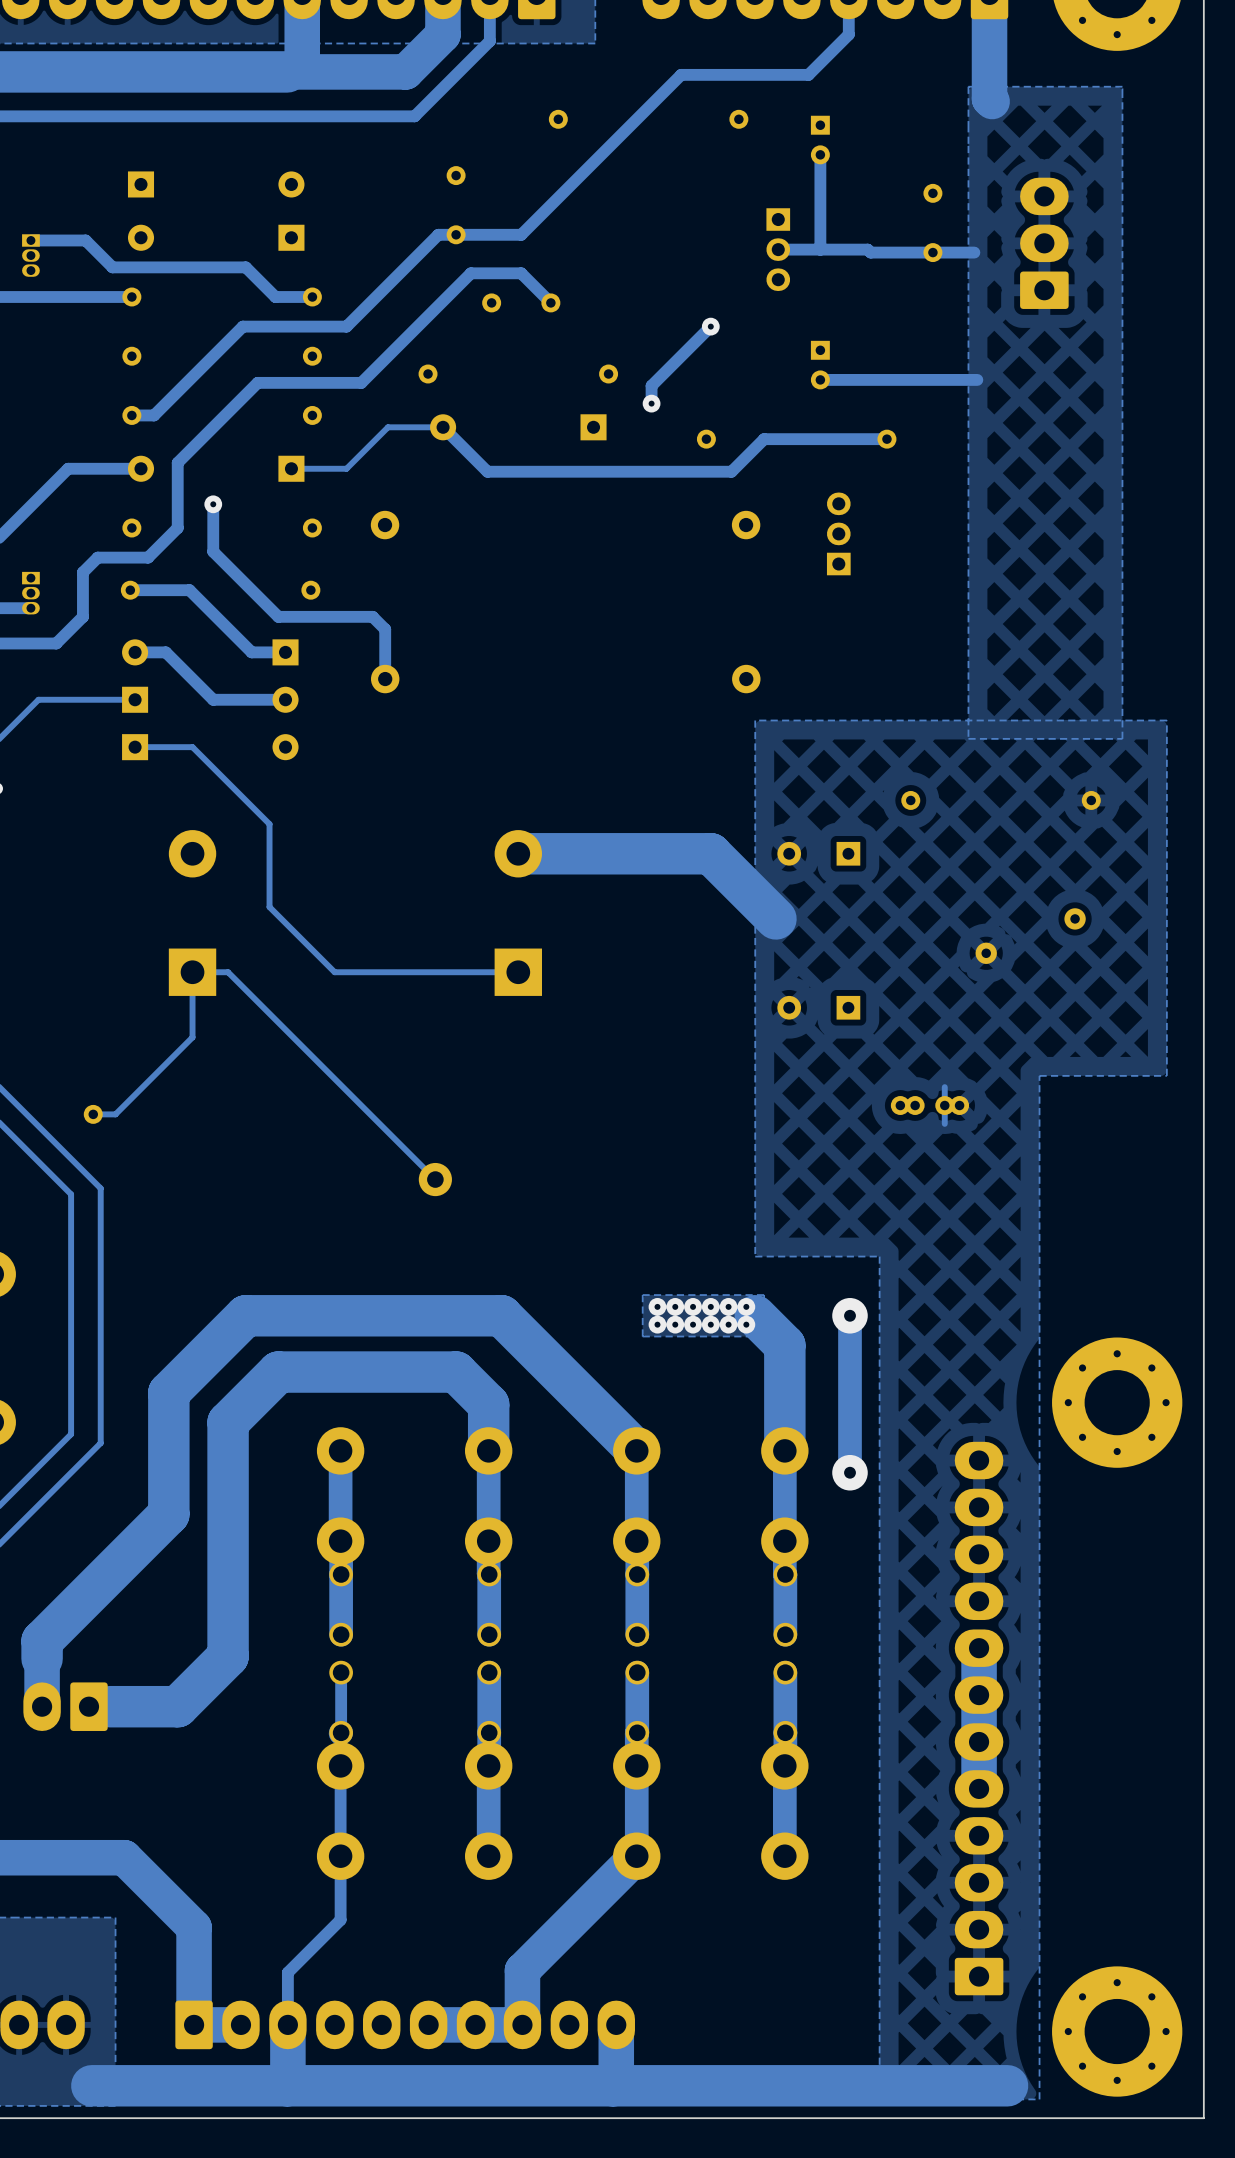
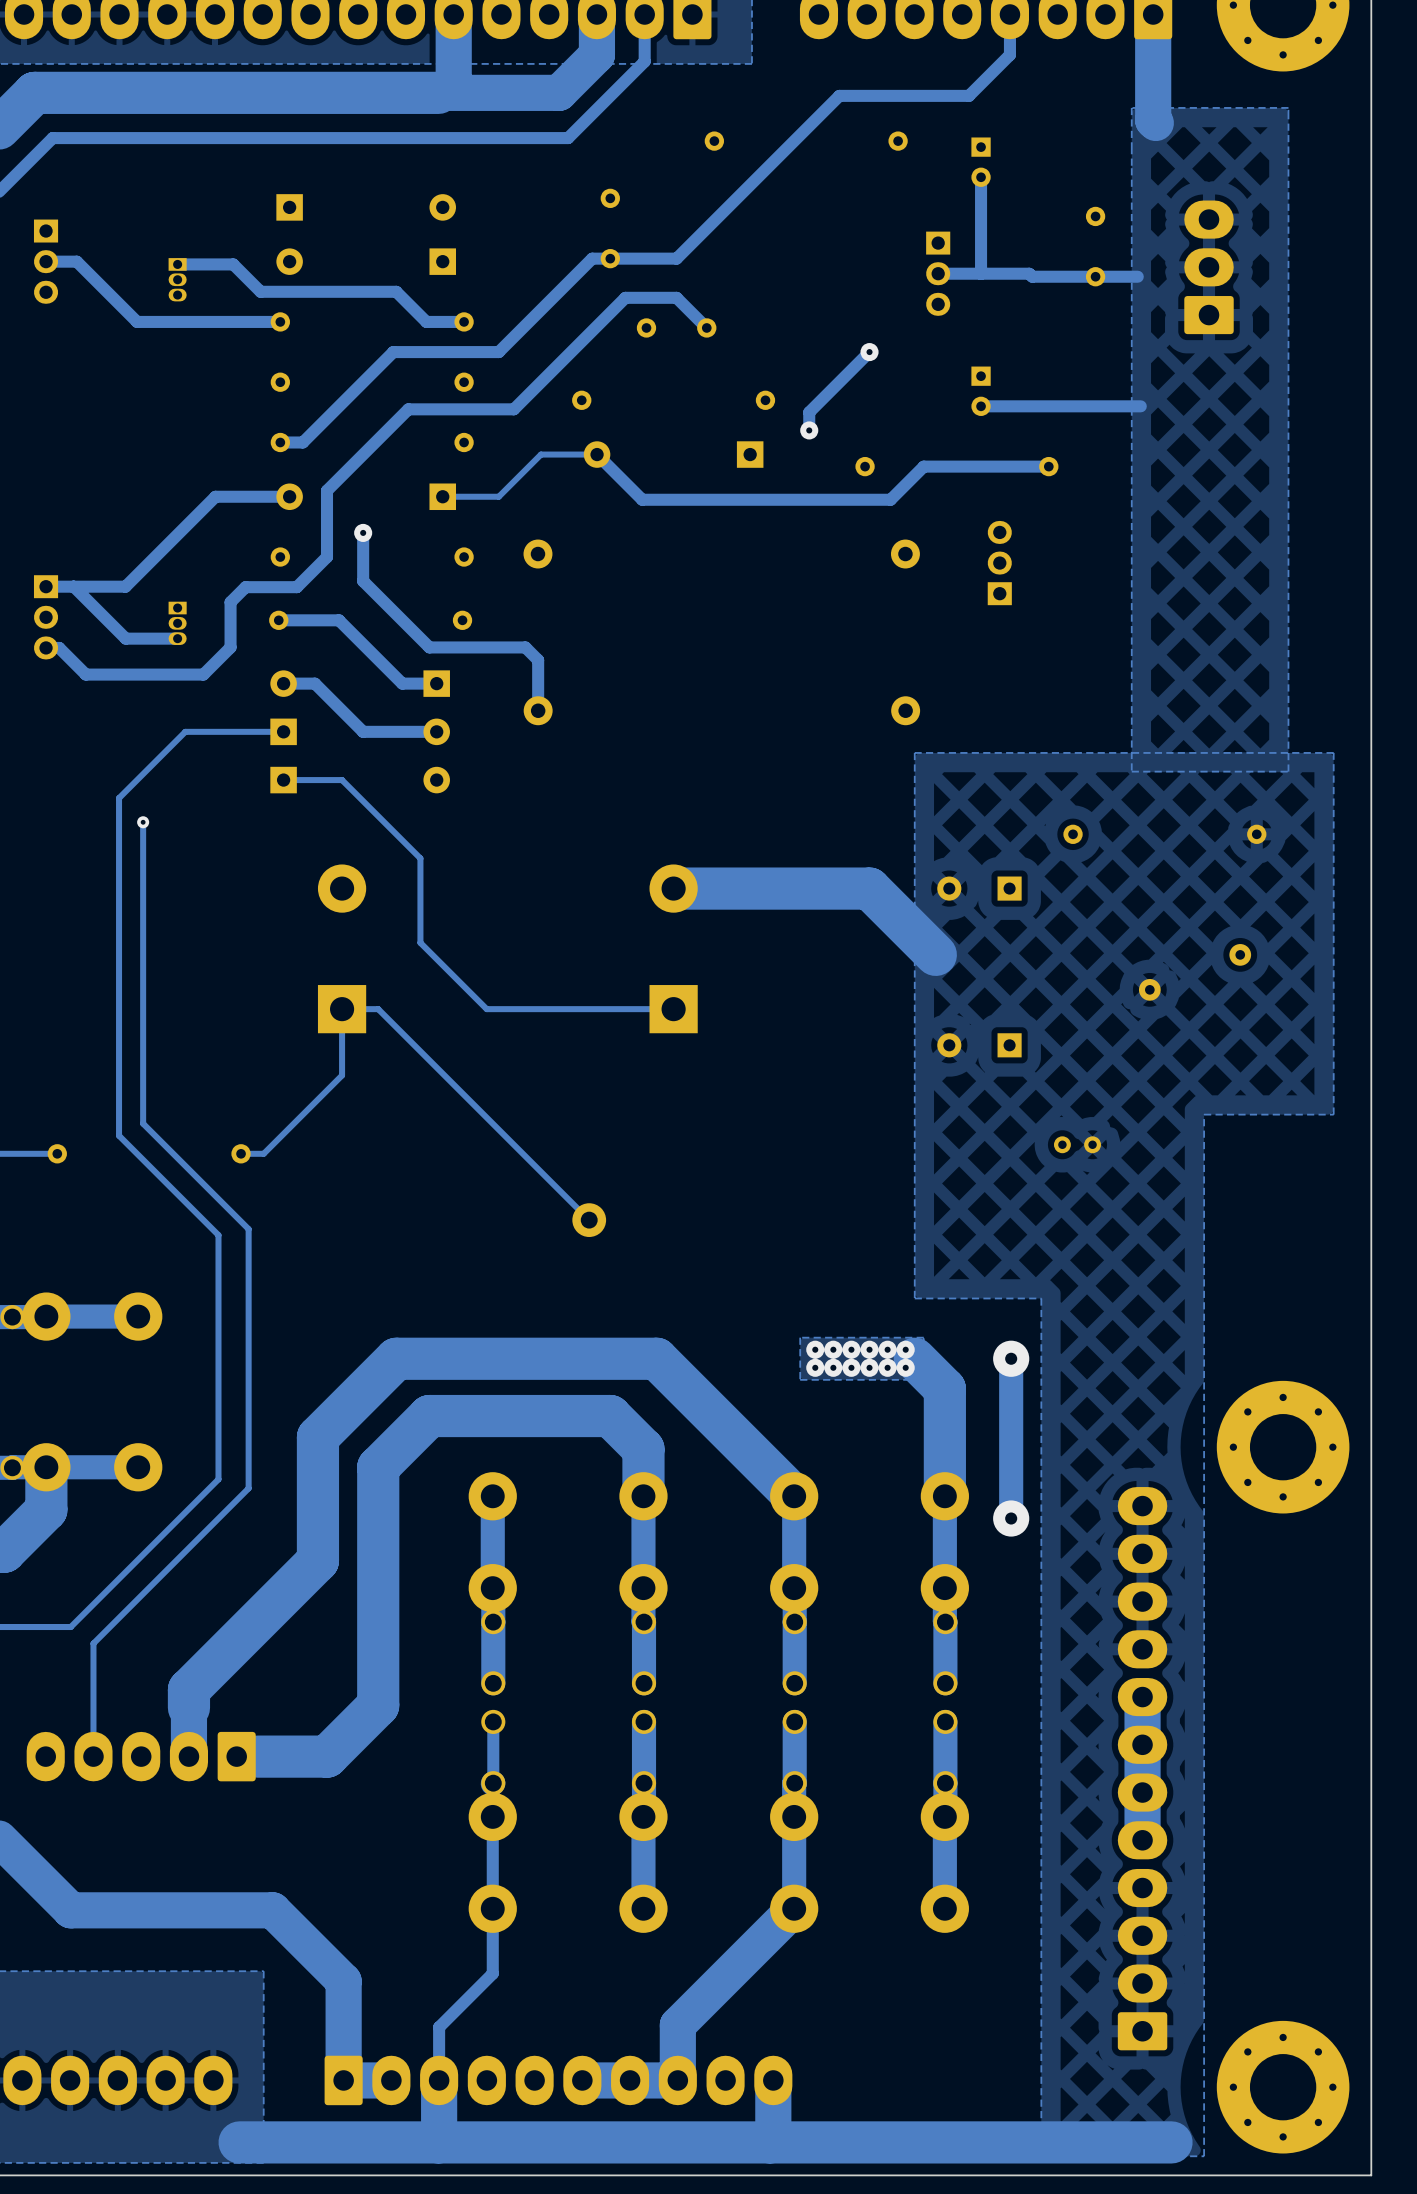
track: (944, 1087) (944, 1123) -> none
part: none -> (1077, 1144)
part: (929, 1105) -> none

